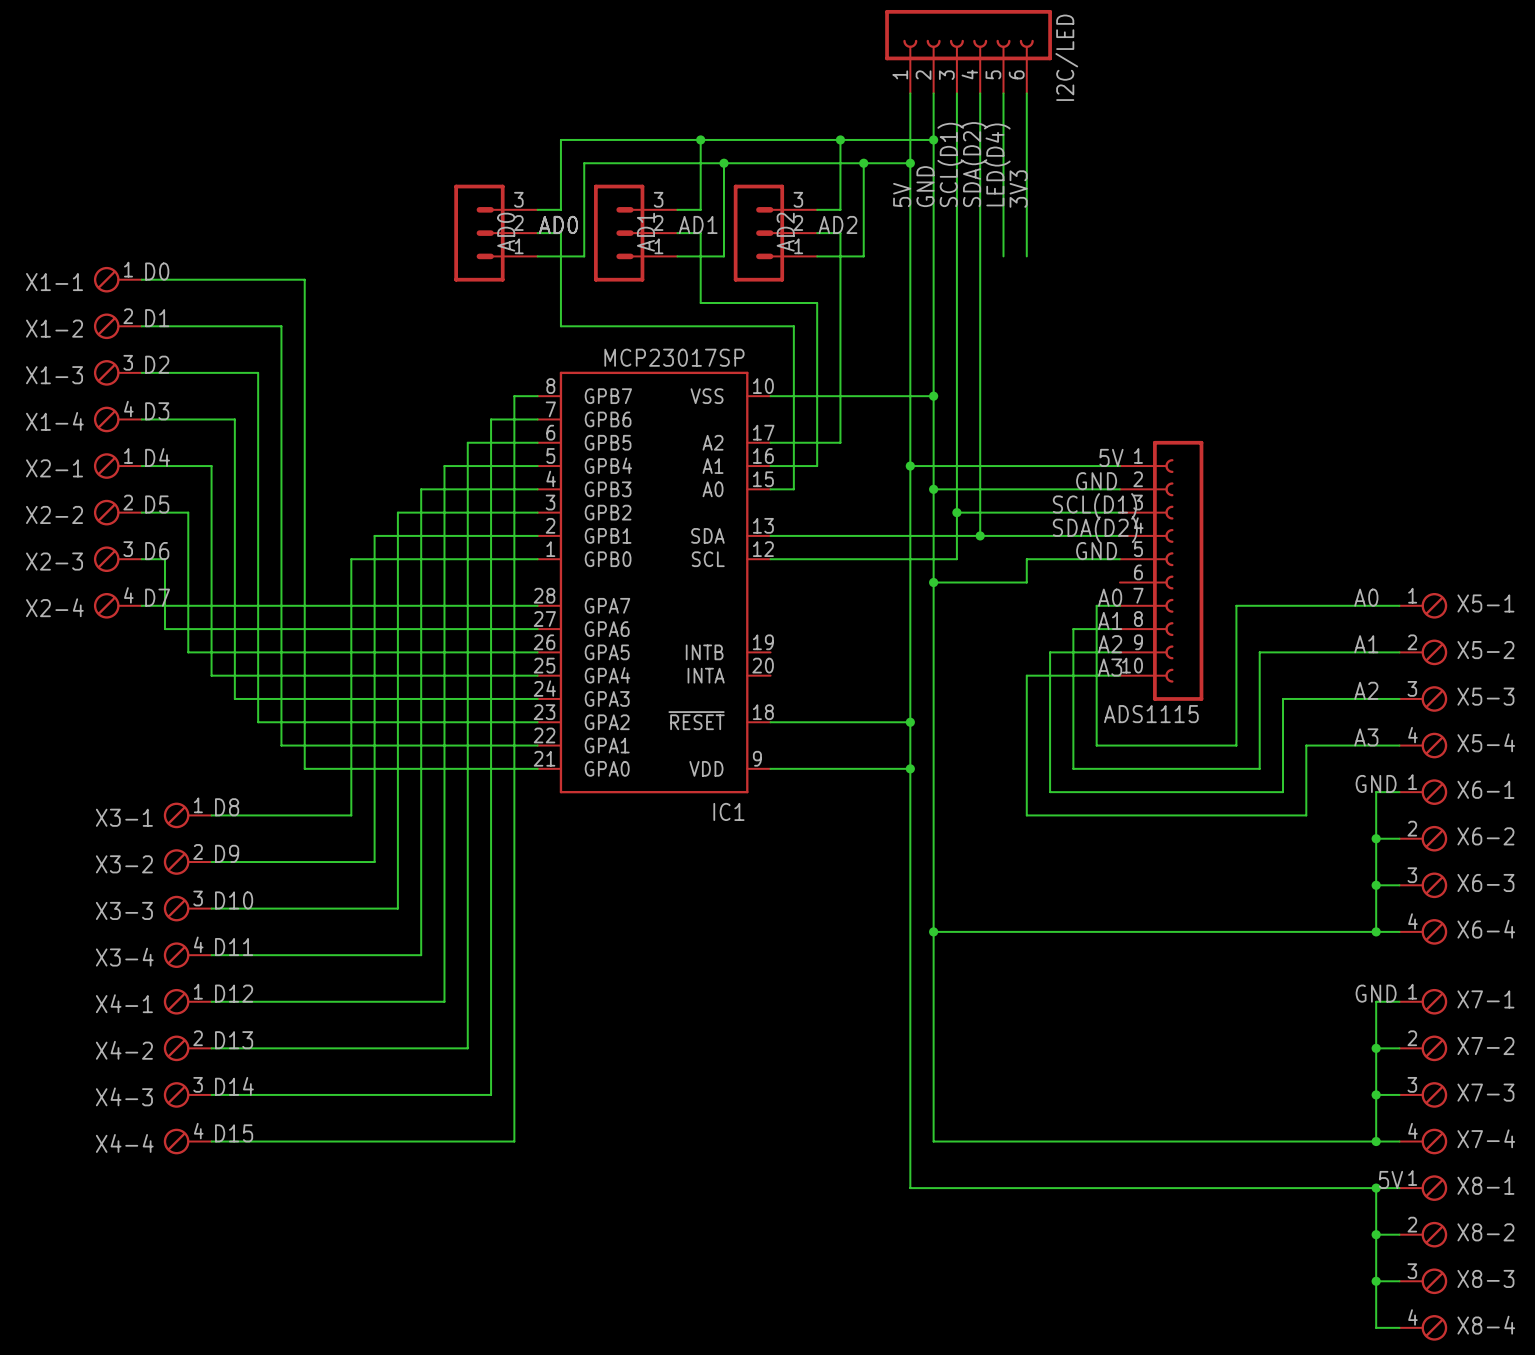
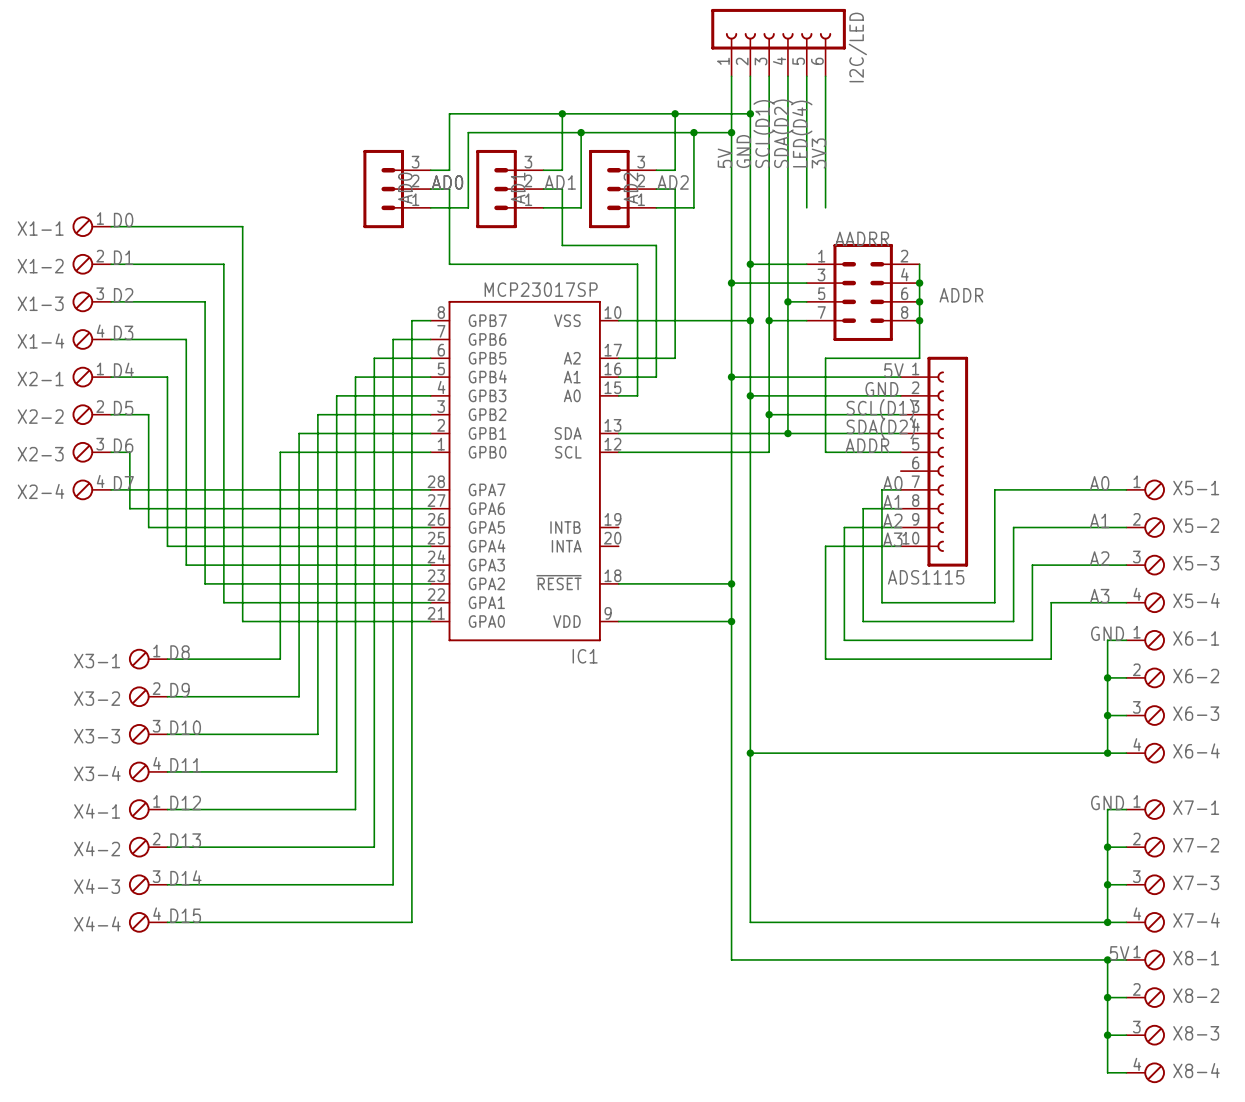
wire: none -> (750, 264) (806, 264)
junction: none -> (750, 264)
wire: none -> (731, 283) (806, 283)
junction: none -> (731, 283)
junction: none -> (919, 283)
AADRR: none -> (863, 292)
label: none -> ADDR (961, 295)
wire: none -> (787, 301) (806, 301)
junction: none -> (787, 301)
junction: none -> (919, 301)
wire: none -> (769, 320) (806, 320)
junction: none -> (769, 320)
junction: none -> (919, 320)
label: none -> ADDR (867, 445)
label: GND (1096, 551) -> none
wire: (1026, 559) (1026, 582) (933, 582) -> (825, 452) (825, 358) (919, 358) (919, 264)
junction: (933, 582) -> none

